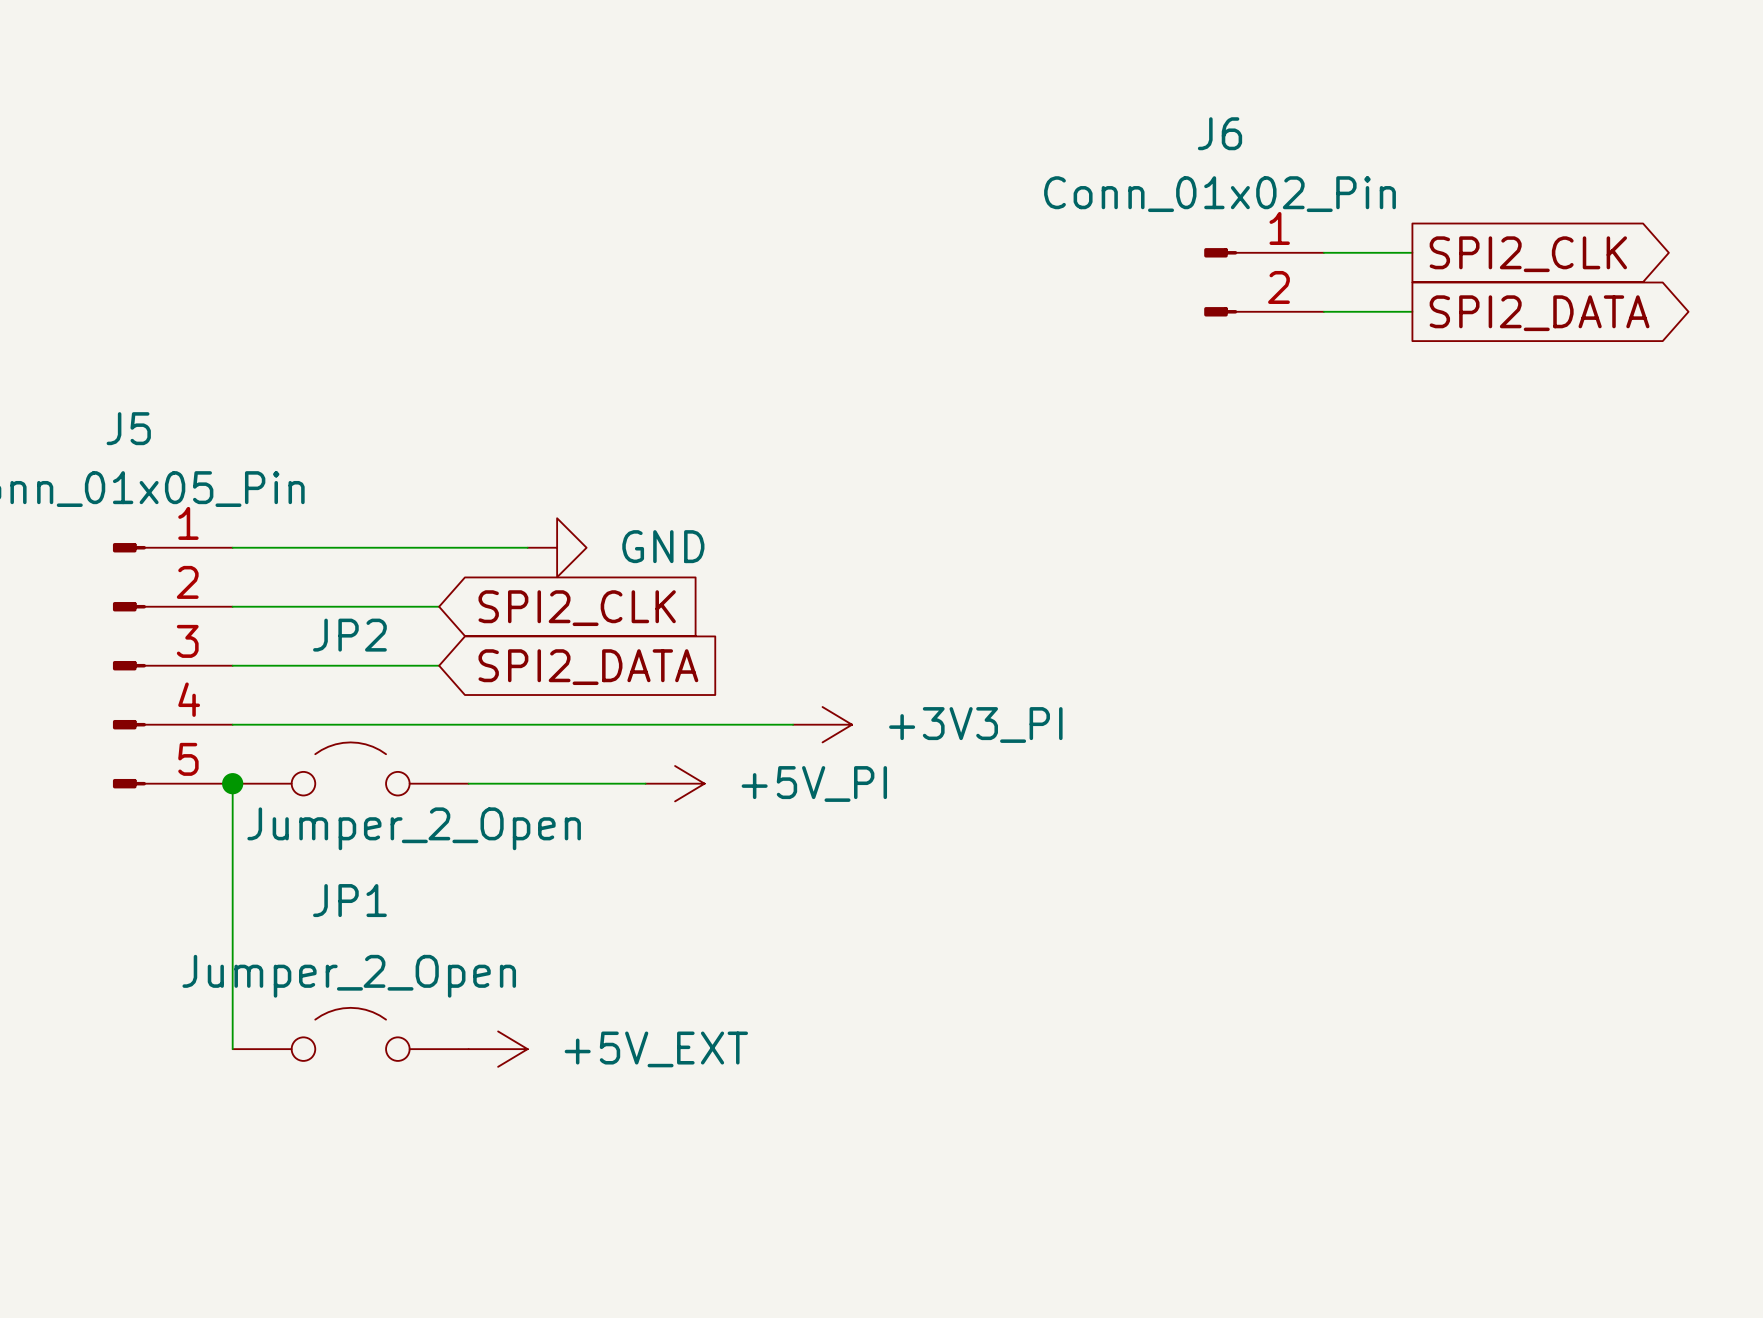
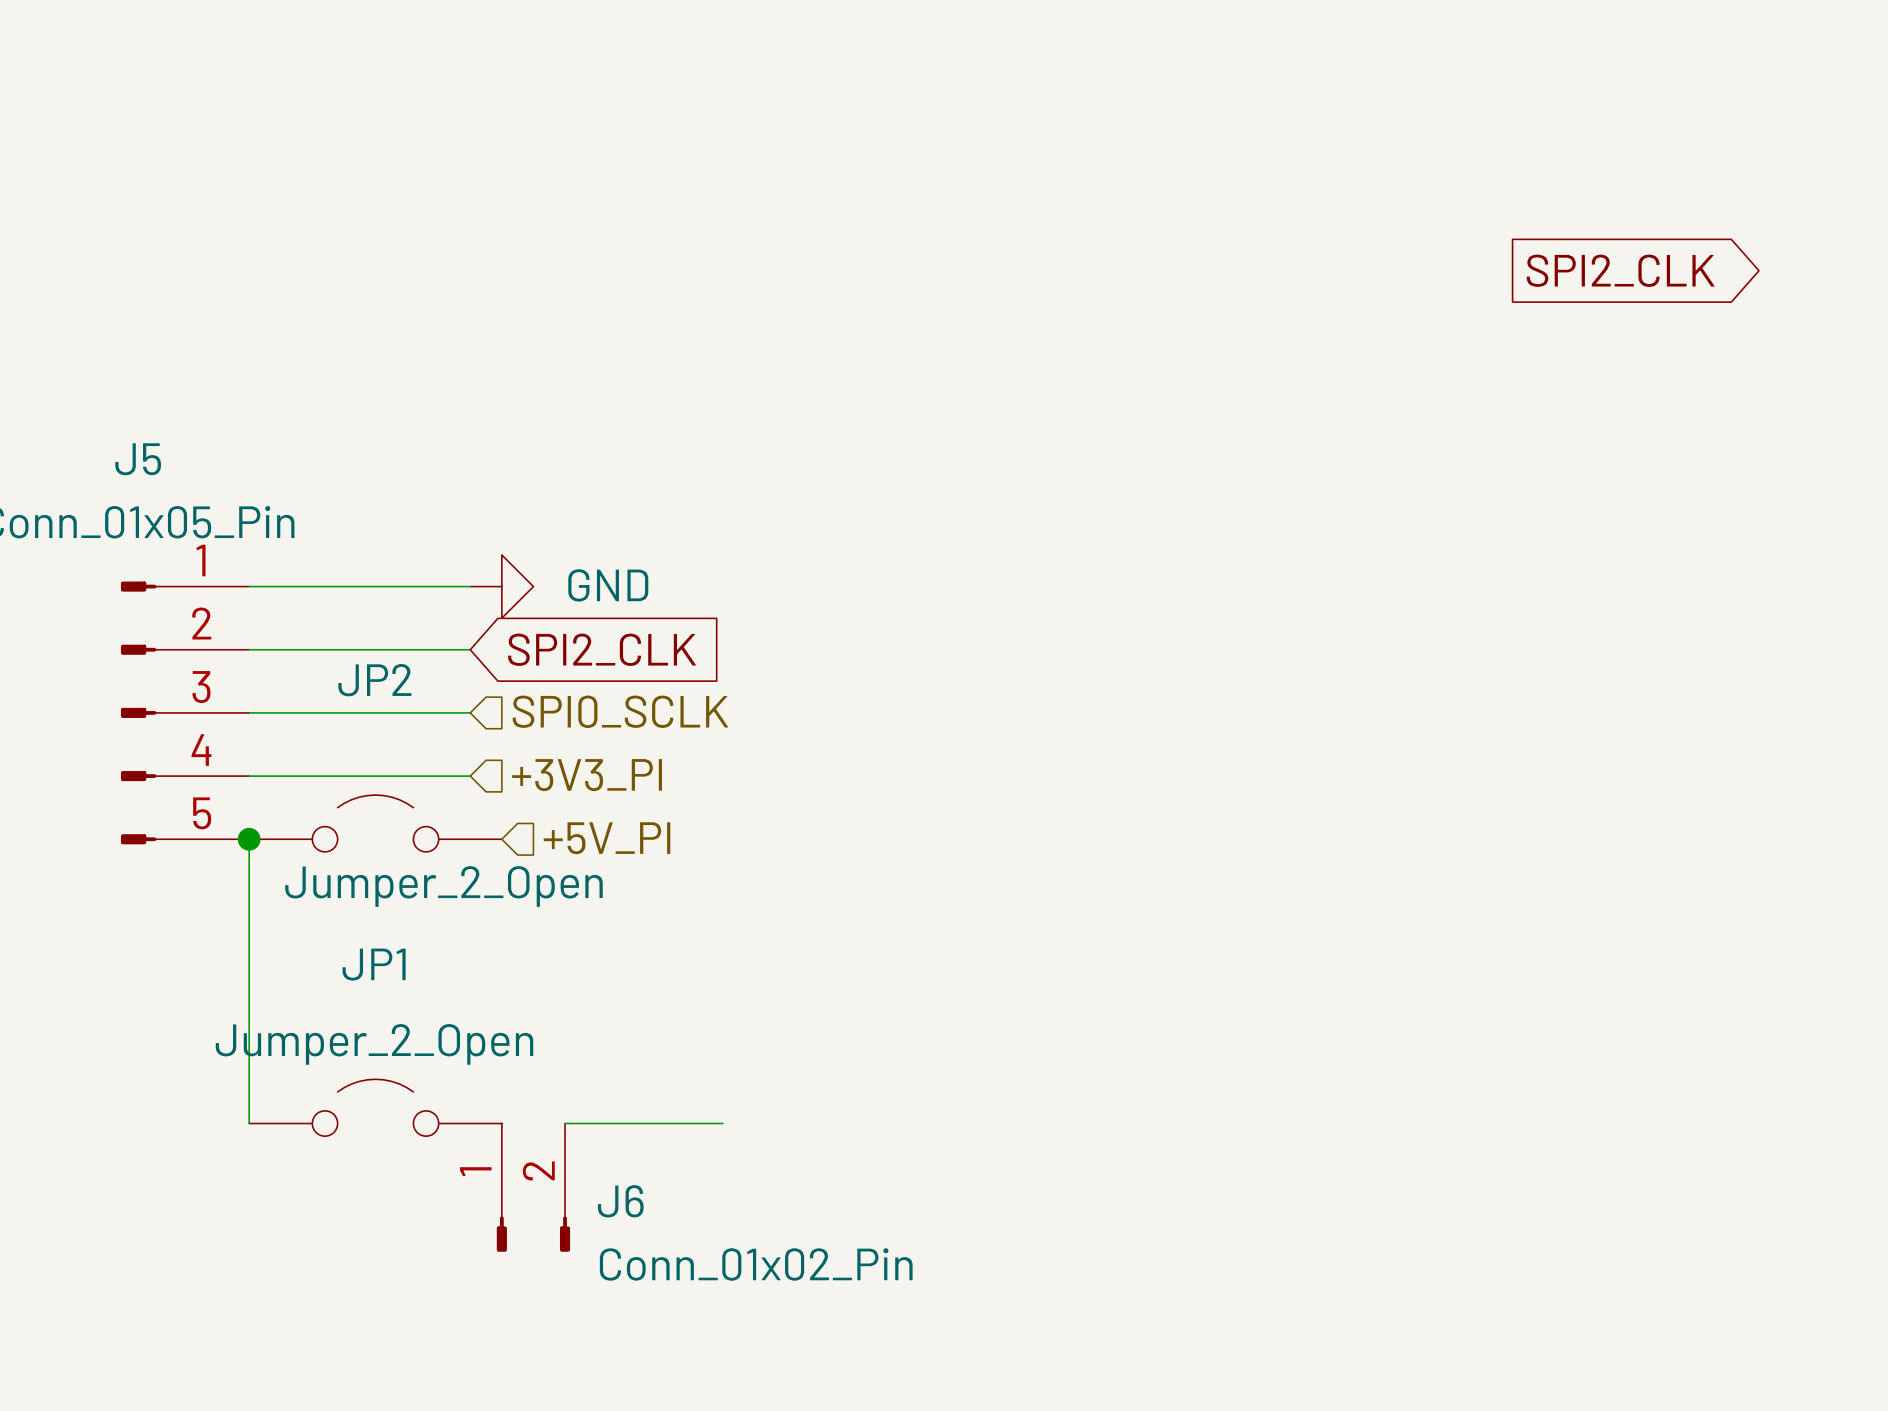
J6 name position: J6 (1220, 133) -> J6 (620, 1201)
J6 value position: Conn_01x02_Pin (1220, 194) -> Conn_01x02_Pin (756, 1264)
wire: (1323, 252) (1412, 252) -> none
J6 rotation: 0° (1220, 282) -> 90° counterclockwise (533, 1234)
J6 position: (1264, 282) -> (533, 1187)
wire: (1323, 311) (1412, 311) -> none
global label: SPI2_DATA (1539, 313) -> none
wire: (439, 547) (527, 547) -> none
power symbol position: GND (557, 547) -> GND (501, 586)
hierarchical label: none -> SPI0_SCLK (620, 711)
global label: SPI2_DATA (588, 667) -> none
wire: (439, 724) (793, 724) -> none
power symbol: +3V3_PI (822, 724) -> none
hierarchical label: none -> +3V3_PI (587, 775)
wire: (468, 783) (645, 783) -> none
hierarchical label: none -> +5V_PI (607, 838)
power symbol: +5V_PI (675, 783) -> none
power symbol: +5V_EXT (498, 1049) -> none
wire: none -> (565, 1123) (722, 1123)

